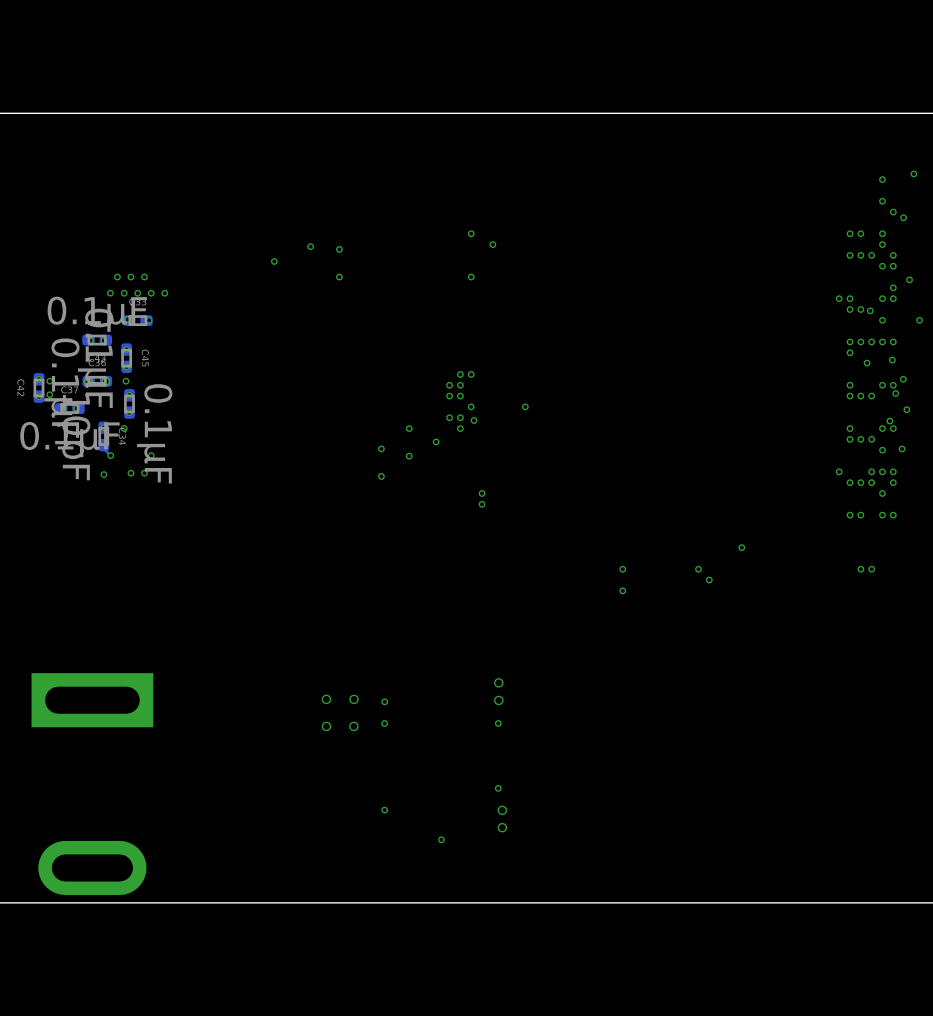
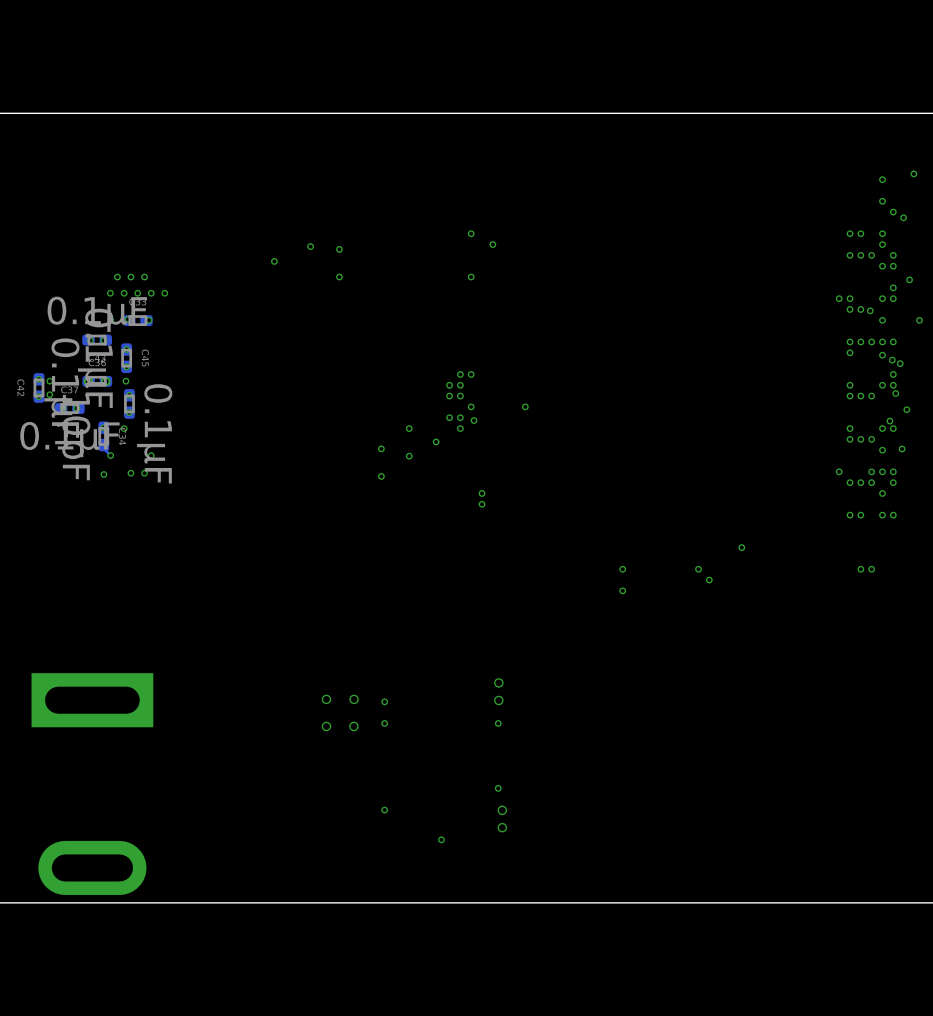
via: none -> (882, 355)
via: (867, 363) -> none
via: none -> (900, 363)
via: none -> (893, 374)
via: (903, 379) -> none

